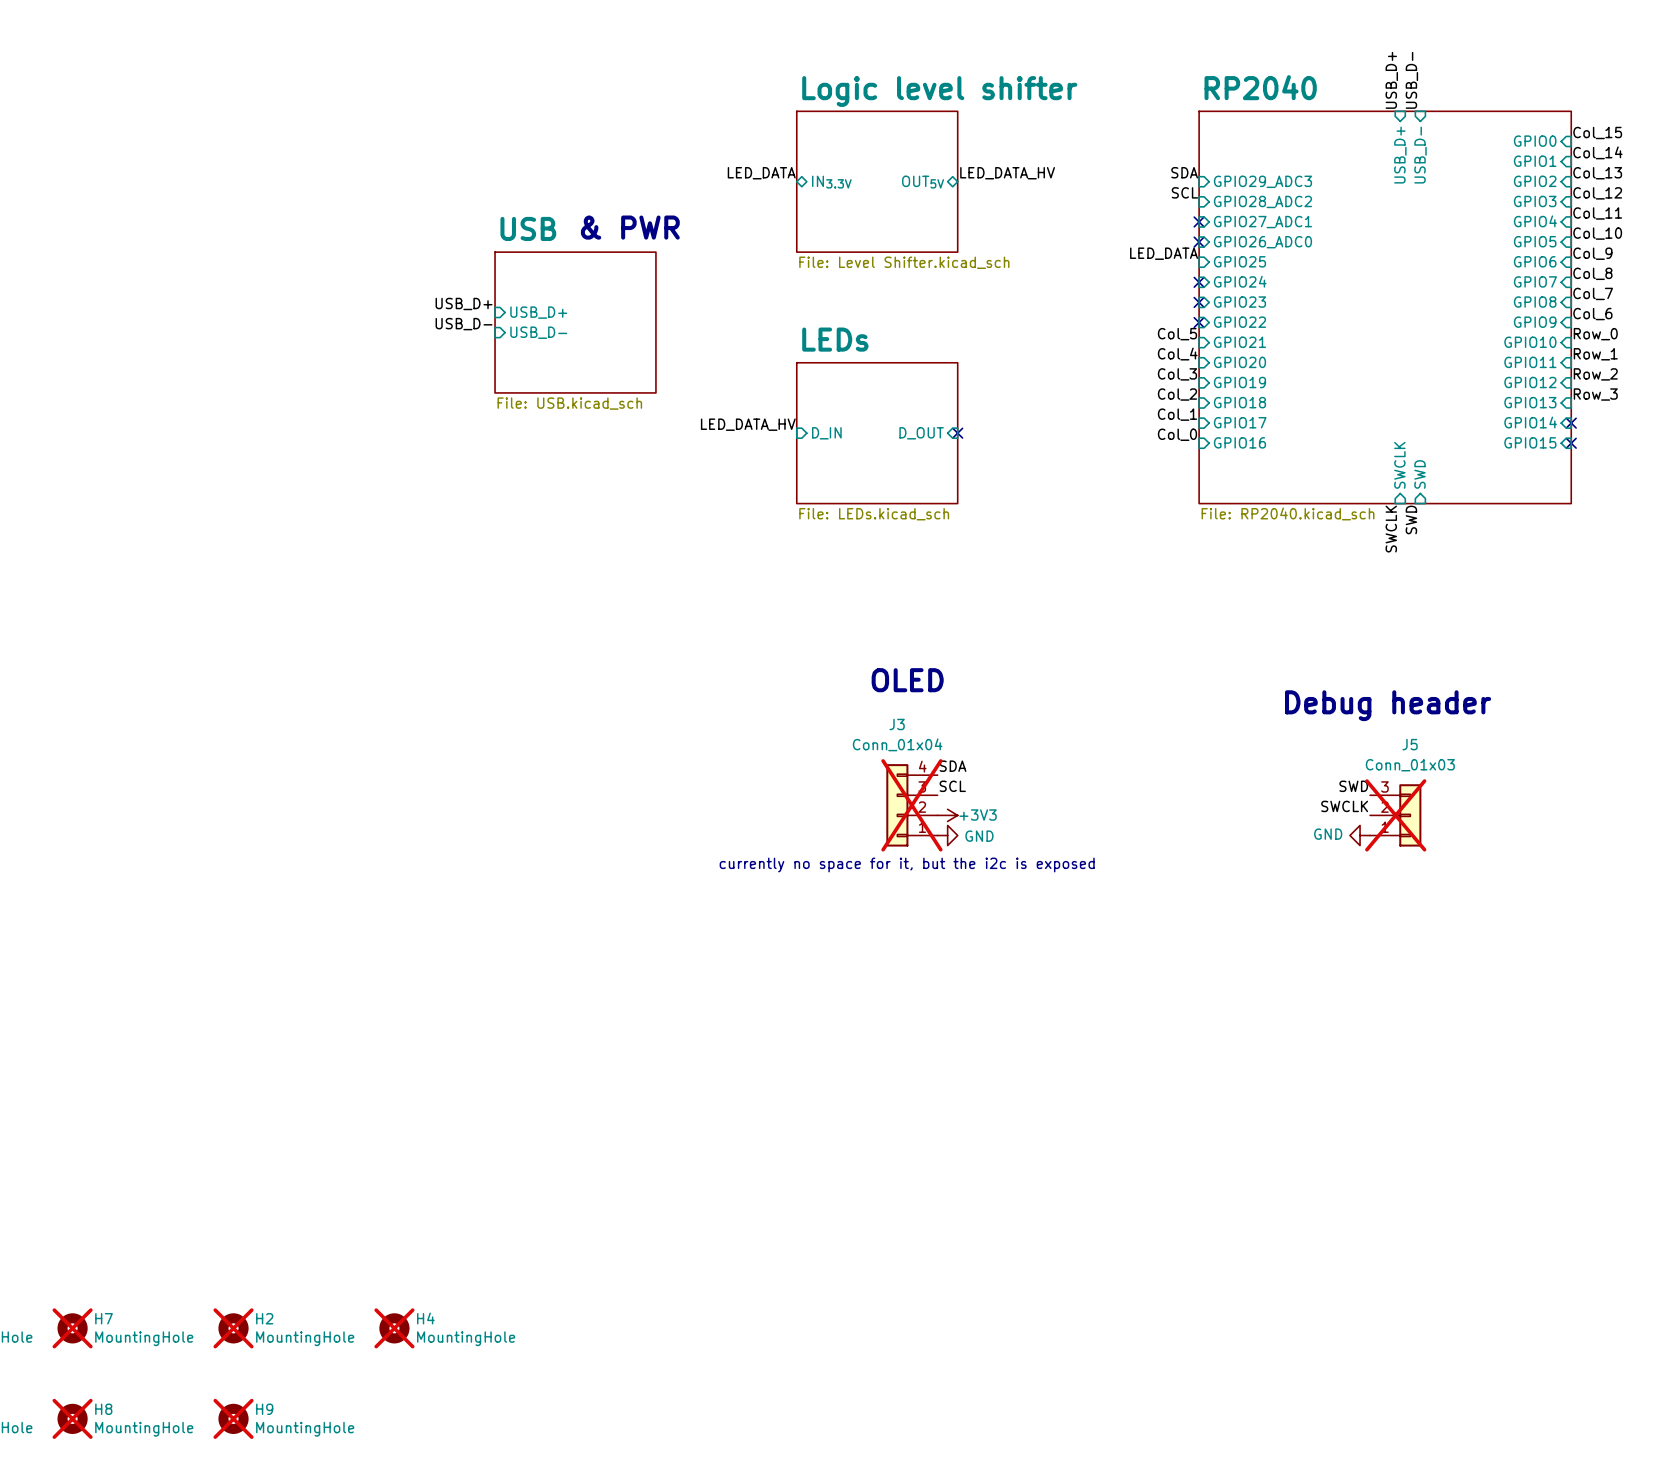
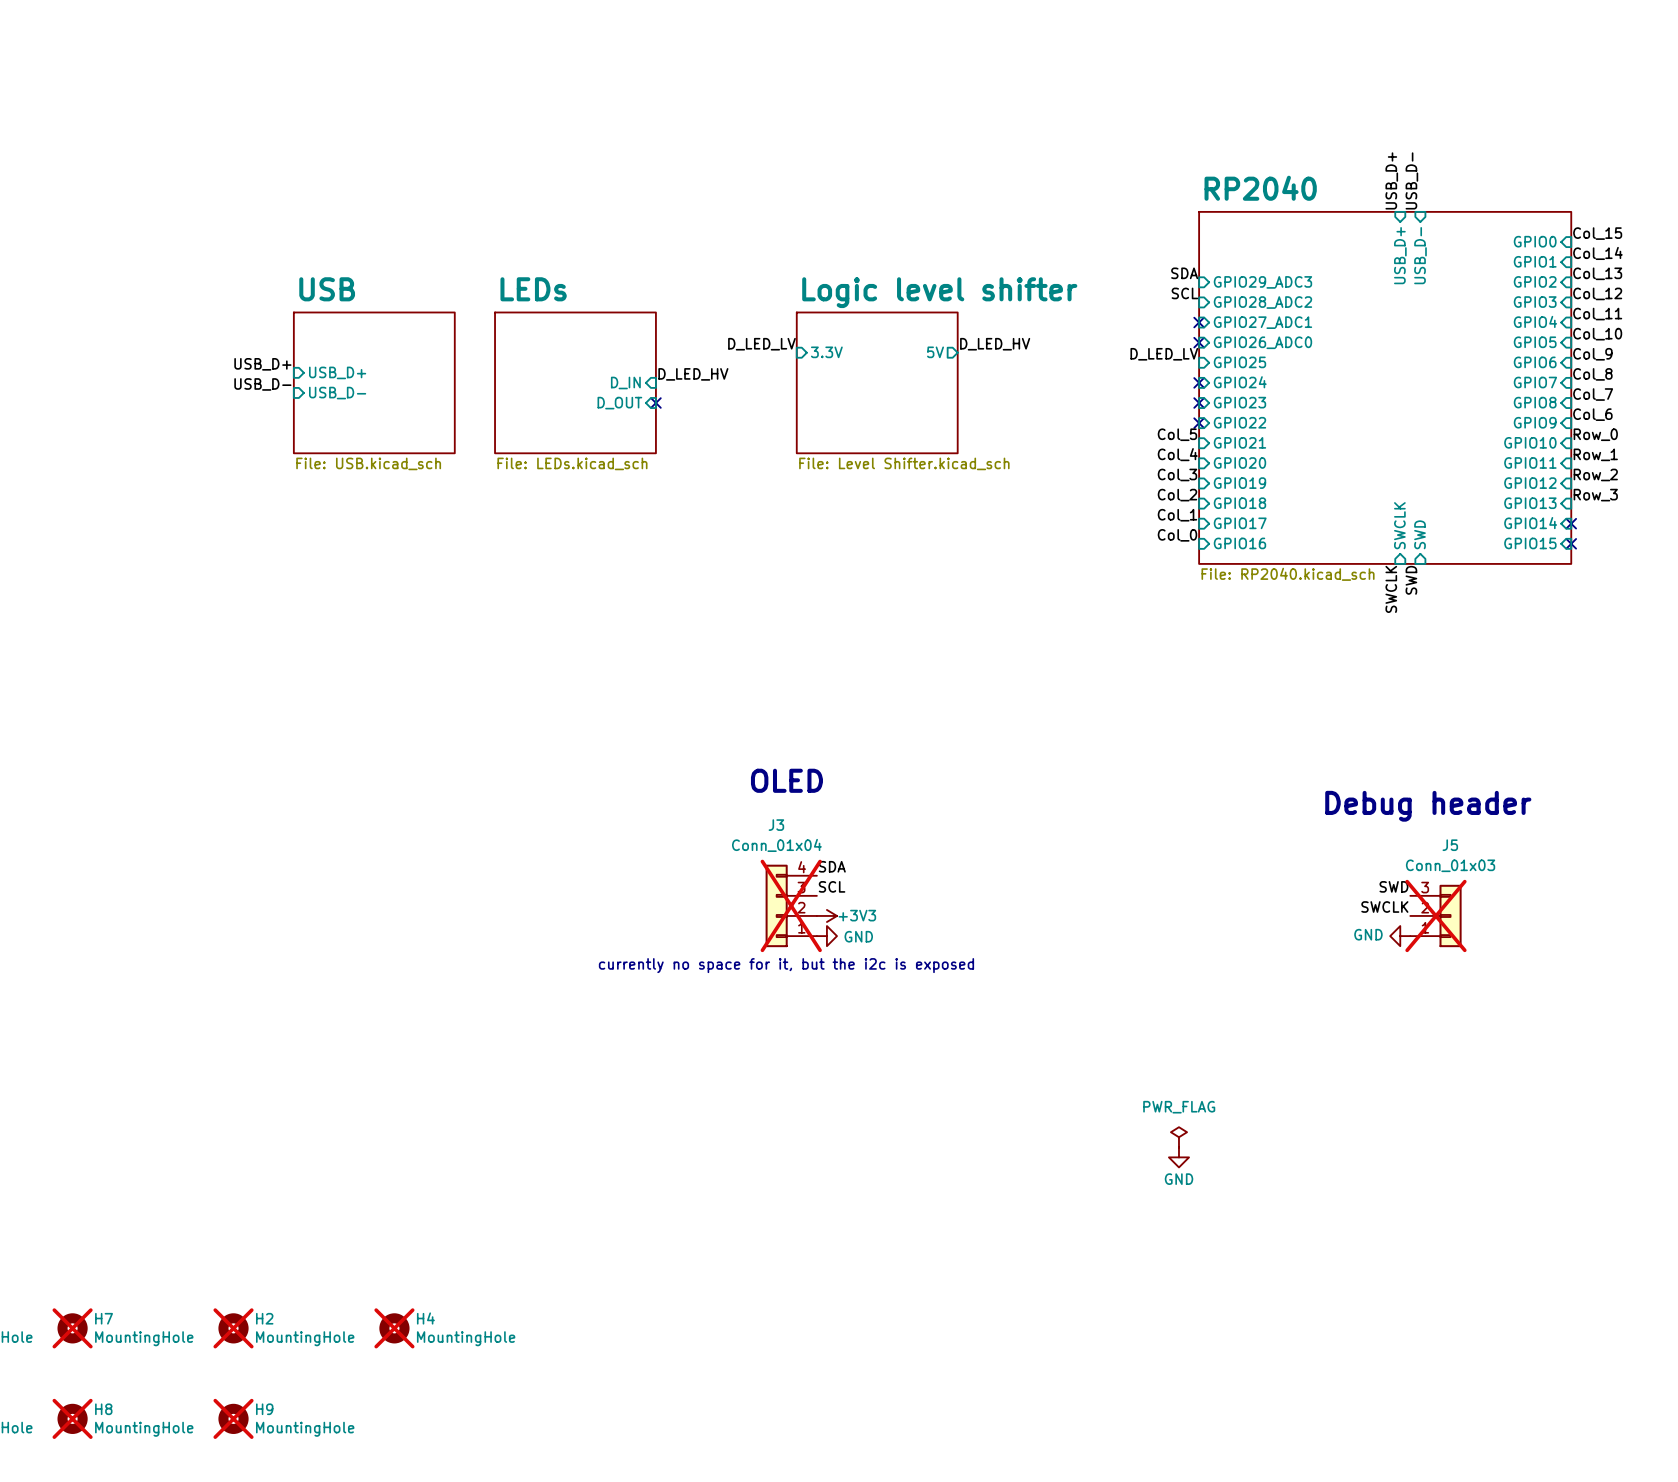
label position: USB_D+ (1391, 80) -> USB_D+ (1391, 180)
label position: USB_D- (1411, 80) -> USB_D- (1411, 180)
sheet RP2040 name position: RP2040 (1260, 87) -> RP2040 (1260, 188)
sheet RP2040 shape: [1198, 110, 1572, 505] -> [1198, 211, 1572, 565]
label: Col_15 (1597, 132) -> none
sheet pin: GPIO0 (1535, 141) -> none
label: Col_14 (1597, 152) -> none
sheet pin position: USB_D+ (1400, 155) -> USB_D+ (1400, 255)
sheet pin position: USB_D- (1420, 155) -> USB_D- (1420, 255)
sheet pin: GPIO1 (1535, 161) -> none
label position: SDA (1184, 172) -> SDA (1184, 273)
label: LED_DATA (761, 173) -> none
label: LED_DATA_HV (1007, 173) -> none
label: Col_13 (1597, 173) -> none
sheet Logic level shifter: File: Level Shifter.kicad_sch (877, 181) -> none
sheet pin: GPIO29_ADC3 (1262, 181) -> none
sheet pin: GPIO2 (1535, 181) -> none
sheet pin: IN3.3V (831, 182) -> none
sheet pin: OUT5V (923, 182) -> none
label position: SCL (1184, 192) -> SCL (1184, 293)
label: Col_12 (1597, 193) -> none
sheet pin: GPIO28_ADC2 (1262, 201) -> none
sheet pin: GPIO3 (1535, 201) -> none
label: Col_11 (1597, 213) -> none
no-connect mark: (1199, 221) -> none
sheet pin: GPIO4 (1535, 221) -> none
sheet pin: GPIO27_ADC1 (1262, 222) -> none
text: & PWR (630, 227) -> none
label: Col_10 (1597, 233) -> Col_15 (1597, 233)
sheet pin: GPIO5 (1535, 241) -> GPIO0 (1535, 241)
no-connect mark: (1199, 242) -> none
sheet pin: GPIO26_ADC0 (1262, 242) -> none
label: LED_DATA (1164, 253) -> none
label: Col_9 (1592, 253) -> Col_14 (1597, 253)
sheet pin: GPIO25 (1239, 261) -> none
sheet pin: GPIO6 (1535, 261) -> GPIO1 (1535, 261)
label: Col_8 (1592, 273) -> Col_13 (1597, 273)
sheet pin: GPIO24 (1240, 281) -> GPIO29_ADC3 (1262, 282)
sheet pin: GPIO7 (1535, 281) -> GPIO2 (1535, 281)
no-connect mark: (1199, 282) -> none
label: Col_7 (1593, 293) -> Col_12 (1597, 293)
no-connect mark: (1199, 302) -> none
sheet pin: GPIO23 (1239, 302) -> GPIO28_ADC2 (1262, 302)
sheet pin: GPIO8 (1535, 302) -> GPIO3 (1535, 302)
label: USB_D+ (464, 303) -> none
sheet pin: USB_D+ (538, 312) -> none
label: Col_6 (1592, 314) -> Col_11 (1597, 314)
sheet USB: File: USB.kicad_sch (575, 322) -> none
sheet pin: GPIO22 (1239, 322) -> GPIO27_ADC1 (1262, 322)
sheet pin: GPIO9 (1535, 322) -> GPIO4 (1535, 321)
label: USB_D- (464, 324) -> none
sheet pin: USB_D- (538, 332) -> none
label: Col_5 (1177, 334) -> none
label: Row_0 (1595, 334) -> Col_10 (1597, 334)
no-connect mark: none -> (1199, 342)
sheet pin: GPIO21 (1239, 342) -> GPIO26_ADC0 (1262, 342)
sheet pin: GPIO10 (1530, 342) -> GPIO5 (1535, 342)
label: none -> D_LED_LV (761, 344)
label: none -> D_LED_HV (995, 344)
sheet pin: none -> 3.3V (826, 352)
sheet pin: none -> 5V (935, 352)
label: Col_4 (1177, 354) -> D_LED_LV (1164, 354)
label: Row_1 (1595, 354) -> Col_9 (1592, 354)
sheet pin: GPIO20 (1239, 362) -> GPIO25 (1239, 362)
sheet pin: GPIO11 (1530, 362) -> GPIO6 (1535, 362)
label: none -> USB_D+ (262, 364)
sheet pin: none -> USB_D+ (337, 372)
label: none -> D_LED_HV (693, 374)
label position: Col_3 (1177, 374) -> Col_3 (1177, 474)
label: Row_2 (1595, 374) -> Col_8 (1592, 374)
sheet USB: none -> File: USB.kicad_sch (374, 382)
sheet LEDs: none -> File: LEDs.kicad_sch (575, 382)
sheet Logic level shifter: none -> File: Level Shifter.kicad_sch (877, 382)
no-connect mark: none -> (1199, 382)
sheet pin: GPIO19 (1239, 382) -> GPIO24 (1240, 382)
sheet pin: GPIO12 (1530, 382) -> GPIO7 (1535, 382)
label: none -> USB_D- (262, 384)
sheet pin: none -> USB_D- (337, 393)
label position: Col_2 (1177, 394) -> Col_2 (1177, 495)
label: Row_3 (1595, 394) -> Col_7 (1593, 394)
sheet pin: GPIO18 (1239, 402) -> GPIO23 (1239, 402)
sheet pin: GPIO13 (1530, 402) -> GPIO8 (1535, 402)
sheet pin: none -> D_OUT (619, 403)
no-connect mark: none -> (655, 403)
no-connect mark: none -> (1199, 403)
label position: Col_1 (1177, 414) -> Col_1 (1177, 515)
label: none -> Col_6 (1592, 414)
sheet pin: GPIO17 (1240, 422) -> GPIO22 (1239, 422)
sheet pin: GPIO14 (1530, 422) -> GPIO9 (1535, 422)
no-connect mark: none -> (1199, 423)
no-connect mark: (1571, 423) -> none
label: LED_DATA_HV (748, 424) -> none
sheet pin rotation: 0° (826, 433) -> 180° (625, 382)
sheet pin position: D_IN (826, 433) -> D_IN (625, 382)
sheet LEDs: File: LEDs.kicad_sch (877, 433) -> none
sheet pin: D_OUT (921, 433) -> none
no-connect mark: (957, 433) -> none
label: Col_0 (1177, 434) -> Col_5 (1177, 434)
label: none -> Row_0 (1595, 434)
sheet pin: GPIO16 (1239, 442) -> GPIO21 (1239, 442)
sheet pin: GPIO15 (1530, 442) -> GPIO10 (1530, 442)
no-connect mark: (1571, 443) -> none
label: none -> Col_4 (1177, 454)
label: none -> Row_1 (1595, 454)
sheet pin: none -> GPIO20 (1239, 462)
sheet pin: none -> GPIO11 (1530, 462)
sheet pin position: SWCLK (1399, 465) -> SWCLK (1399, 525)
sheet pin position: SWD (1420, 474) -> SWD (1420, 534)
label: none -> Row_2 (1595, 474)
sheet pin: none -> GPIO19 (1239, 483)
sheet pin: none -> GPIO12 (1530, 483)
label: none -> Row_3 (1595, 495)
sheet pin: none -> GPIO18 (1239, 503)
sheet pin: none -> GPIO13 (1530, 503)
sheet RP2040 value position: File: RP2040.kicad_sch (1288, 513) -> File: RP2040.kicad_sch (1288, 574)
label position: SWD (1411, 519) -> SWD (1411, 580)
sheet pin: none -> GPIO17 (1240, 523)
sheet pin: none -> GPIO14 (1530, 523)
no-connect mark: none -> (1571, 523)
label position: SWCLK (1391, 529) -> SWCLK (1391, 589)
label: none -> Col_0 (1177, 535)
sheet pin: none -> GPIO16 (1239, 543)
sheet pin: none -> GPIO15 (1530, 543)
no-connect mark: none -> (1571, 543)
text position: OLED (907, 680) -> OLED (786, 780)
text position: Debug header (1388, 705) -> Debug header (1428, 806)
label position: SDA (952, 766) -> SDA (832, 866)
label position: SCL (952, 786) -> SCL (832, 886)
label position: SWD (1353, 786) -> SWD (1393, 886)
J3 position: (911, 805) -> (791, 905)
label position: SWCLK (1344, 806) -> SWCLK (1384, 907)
power symbol position: +3V3 (947, 815) -> +3V3 (826, 915)
J5 position: (1395, 815) -> (1435, 915)
power symbol position: GND (947, 835) -> GND (826, 936)
power symbol position: GND (1360, 835) -> GND (1400, 936)
text position: currently no space for it, but the i2c is exposed (907, 865) -> currently no space for it, but the i2c is exposed (786, 965)
power symbol: none -> PWR_FLAG (1178, 1137)
power symbol: none -> GND (1178, 1157)

